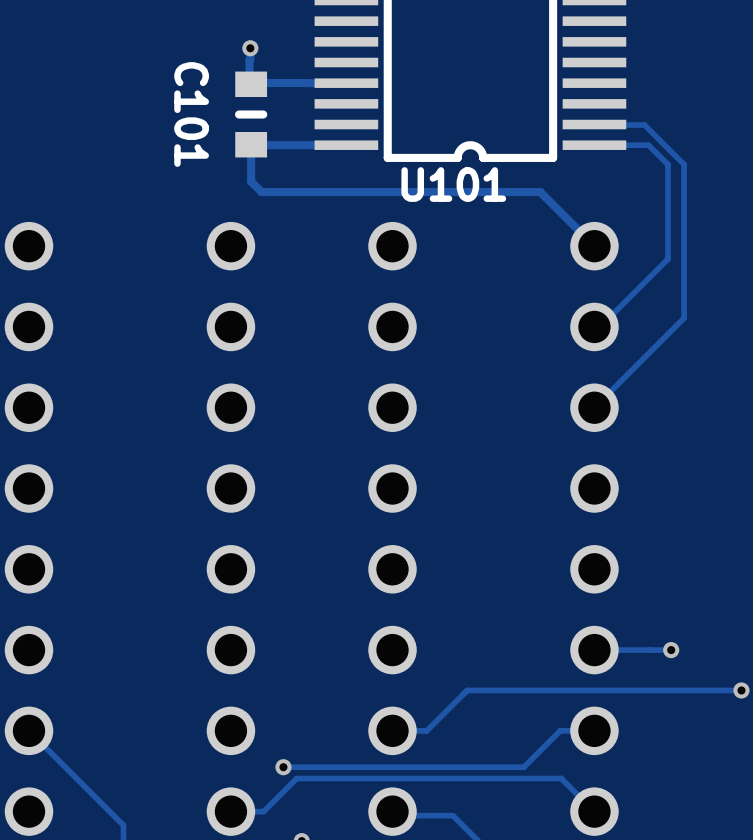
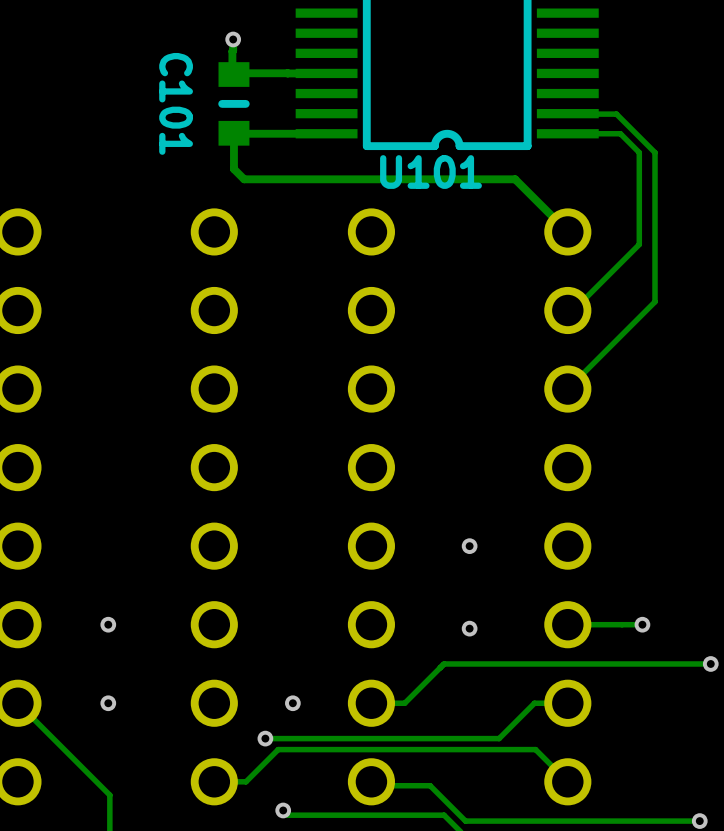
via: none -> (469, 546)
via: none -> (108, 624)
via: none -> (469, 628)
via: none -> (108, 703)
via: none -> (292, 703)

